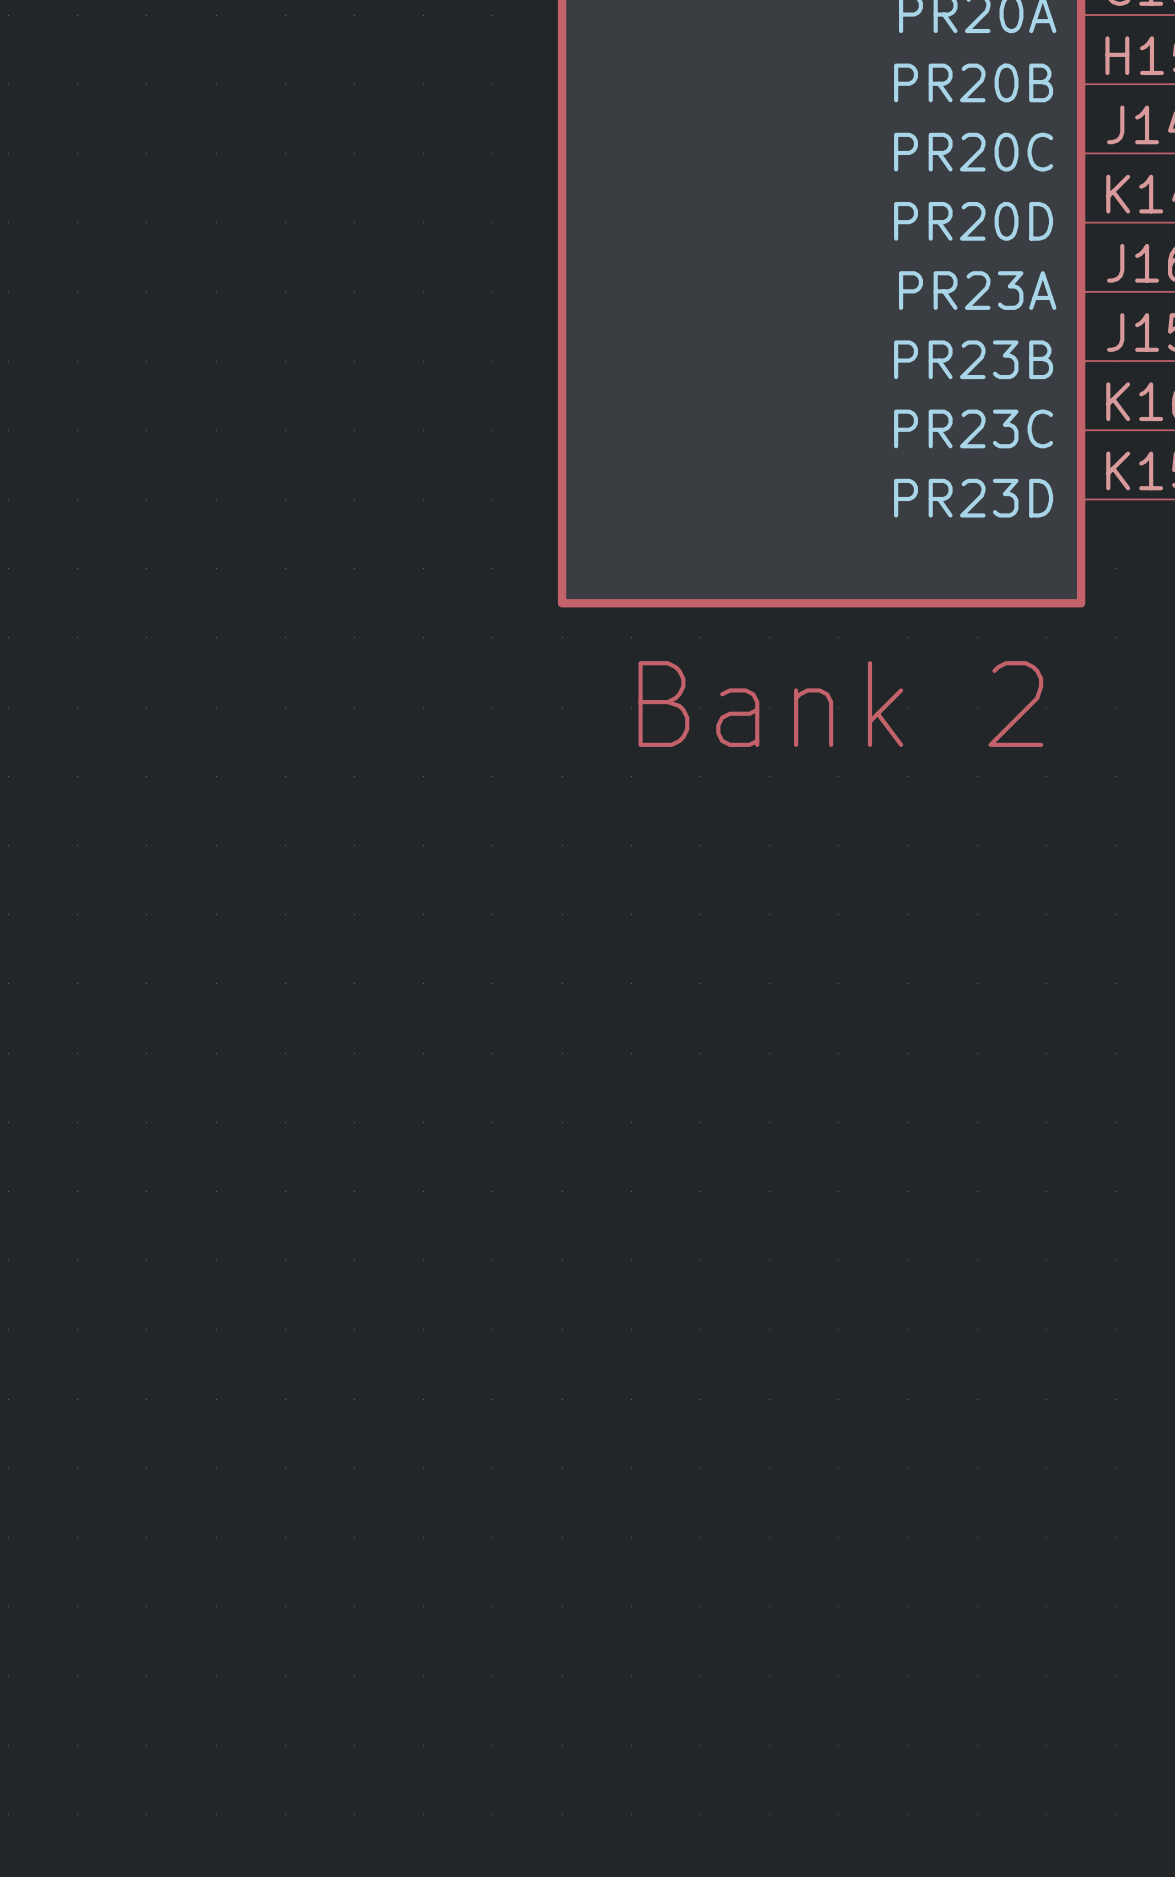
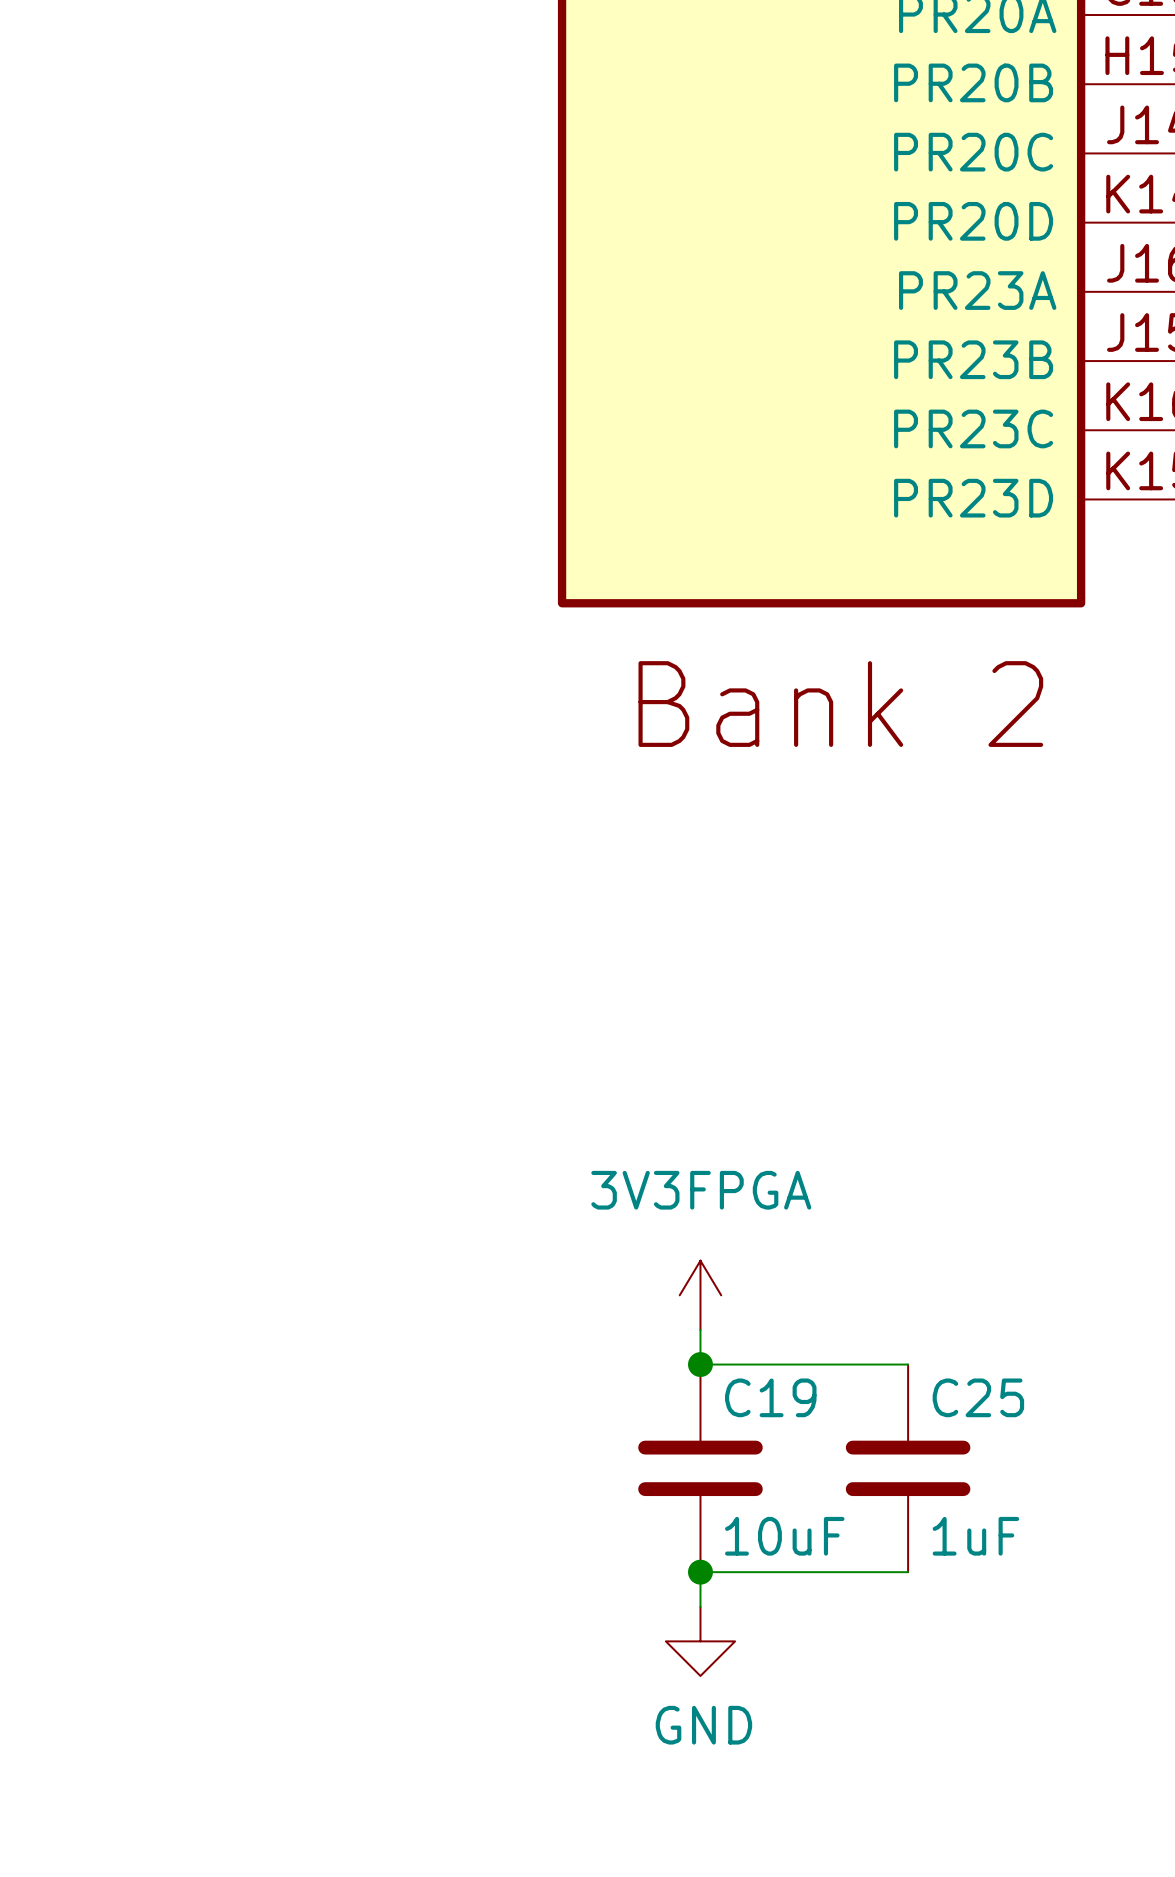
power symbol: none -> 3V3FPGA (700, 1295)
wire: none -> (700, 1329) (700, 1364) (908, 1364)
junction: none -> (700, 1364)
C19: none -> 10uF (700, 1468)
C25: none -> 1uF (908, 1468)
junction: none -> (700, 1572)
wire: none -> (908, 1572) (700, 1572) (700, 1606)
power symbol: none -> GND (700, 1641)

